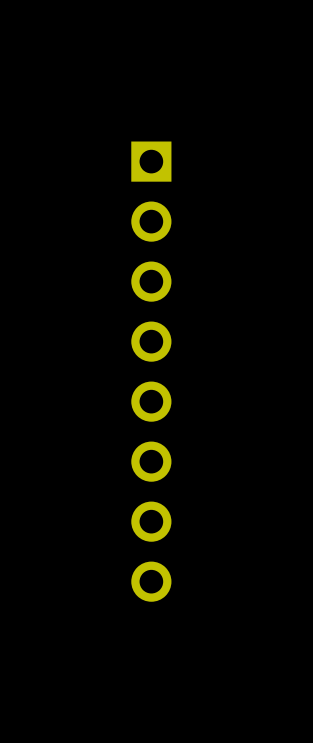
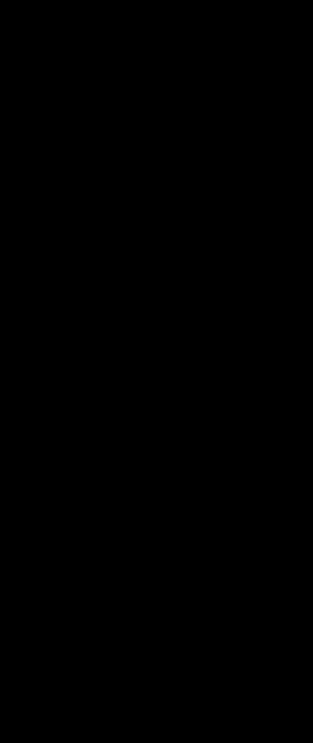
part: (151, 371) -> none

